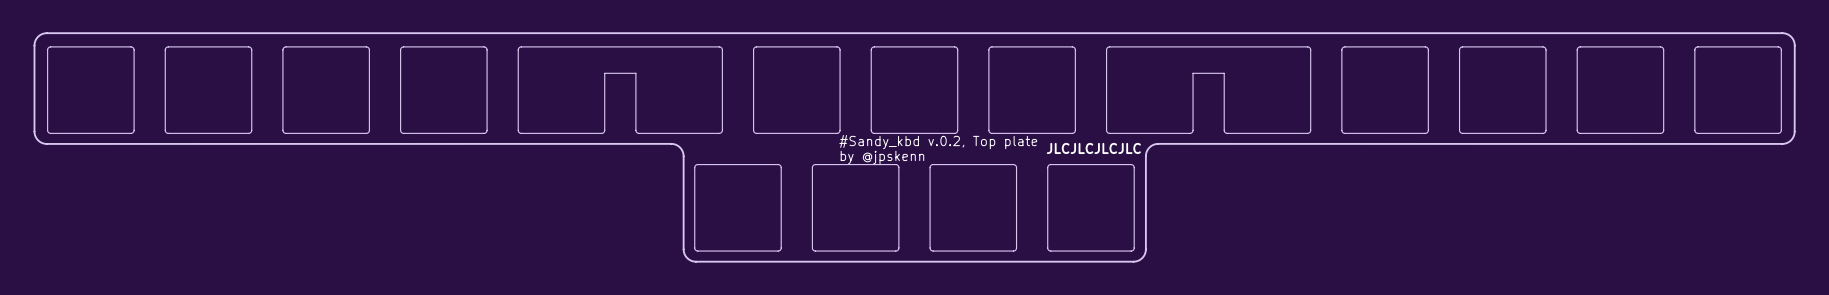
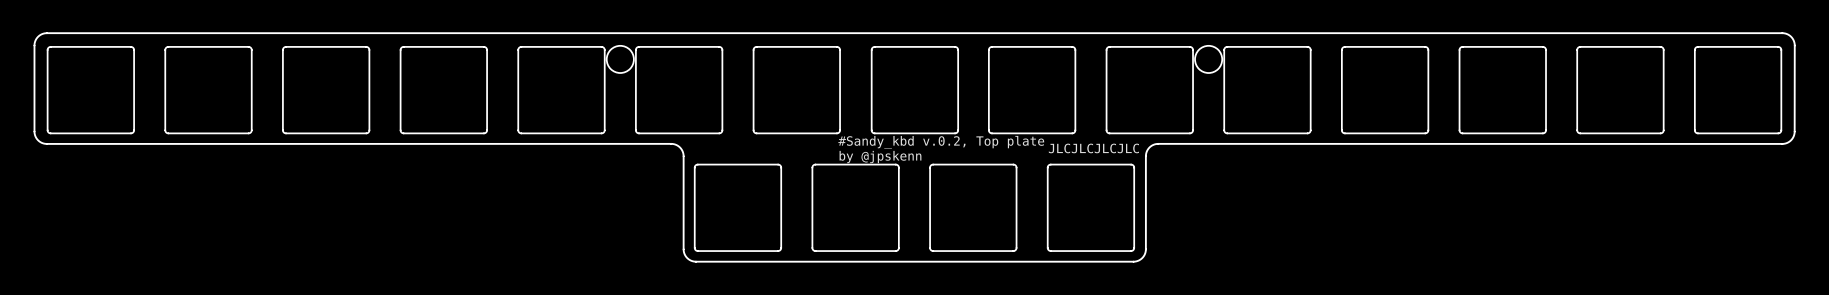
drawing shape: [33, 32, 1796, 263] -> [33, 32, 1796, 263]
drawing: none -> [517, 46, 606, 134]
drawing: none -> [635, 46, 723, 134]
drawing: none -> [871, 46, 959, 134]
drawing: none -> [1106, 46, 1194, 134]
drawing: none -> [1223, 46, 1312, 134]

